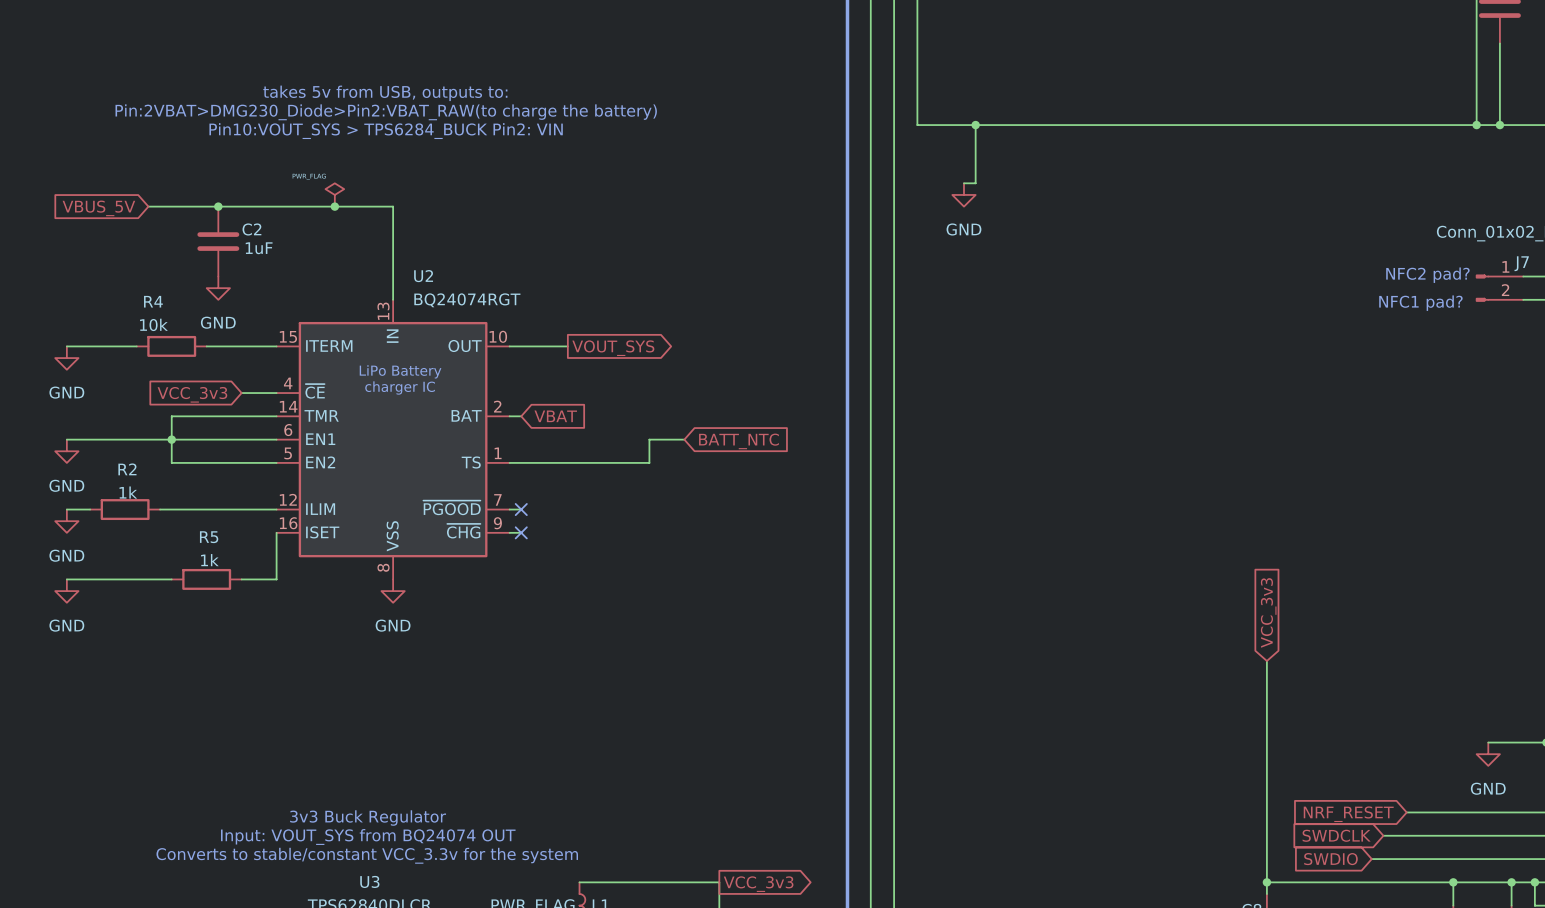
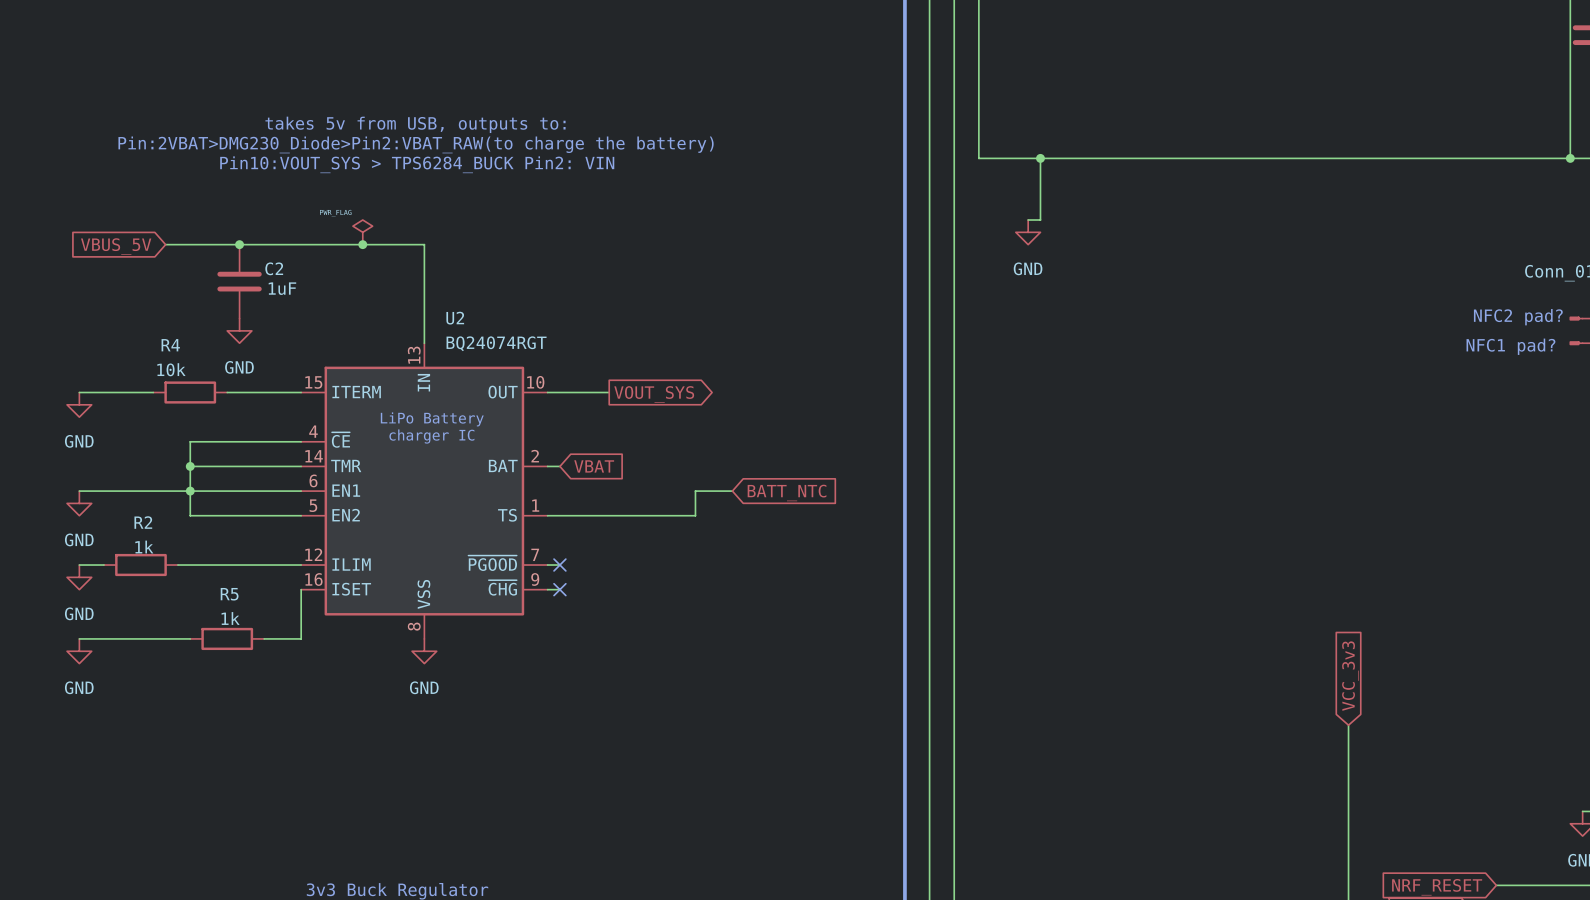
wire: none -> (264, 441) (190, 441) (190, 466)
global label: VCC_3v3 (192, 394) -> none
junction: none -> (190, 466)

